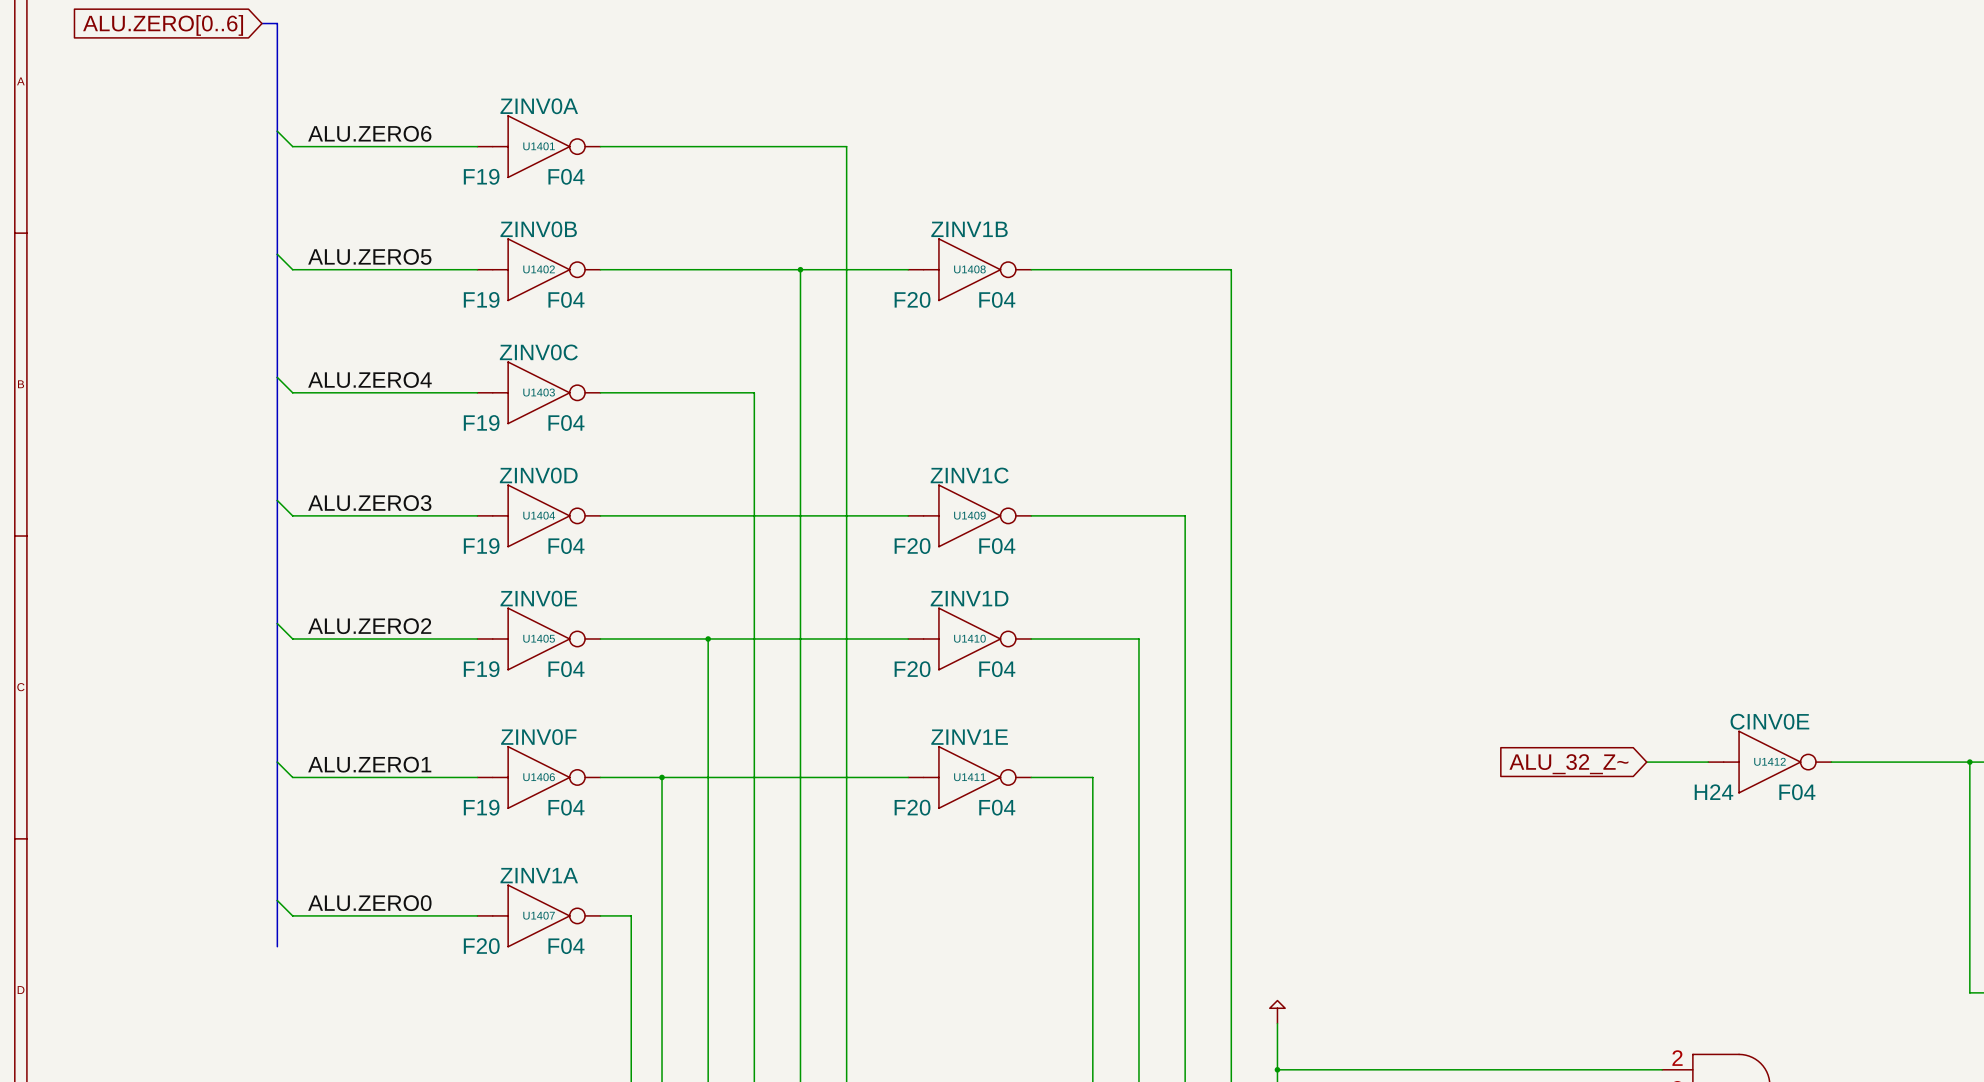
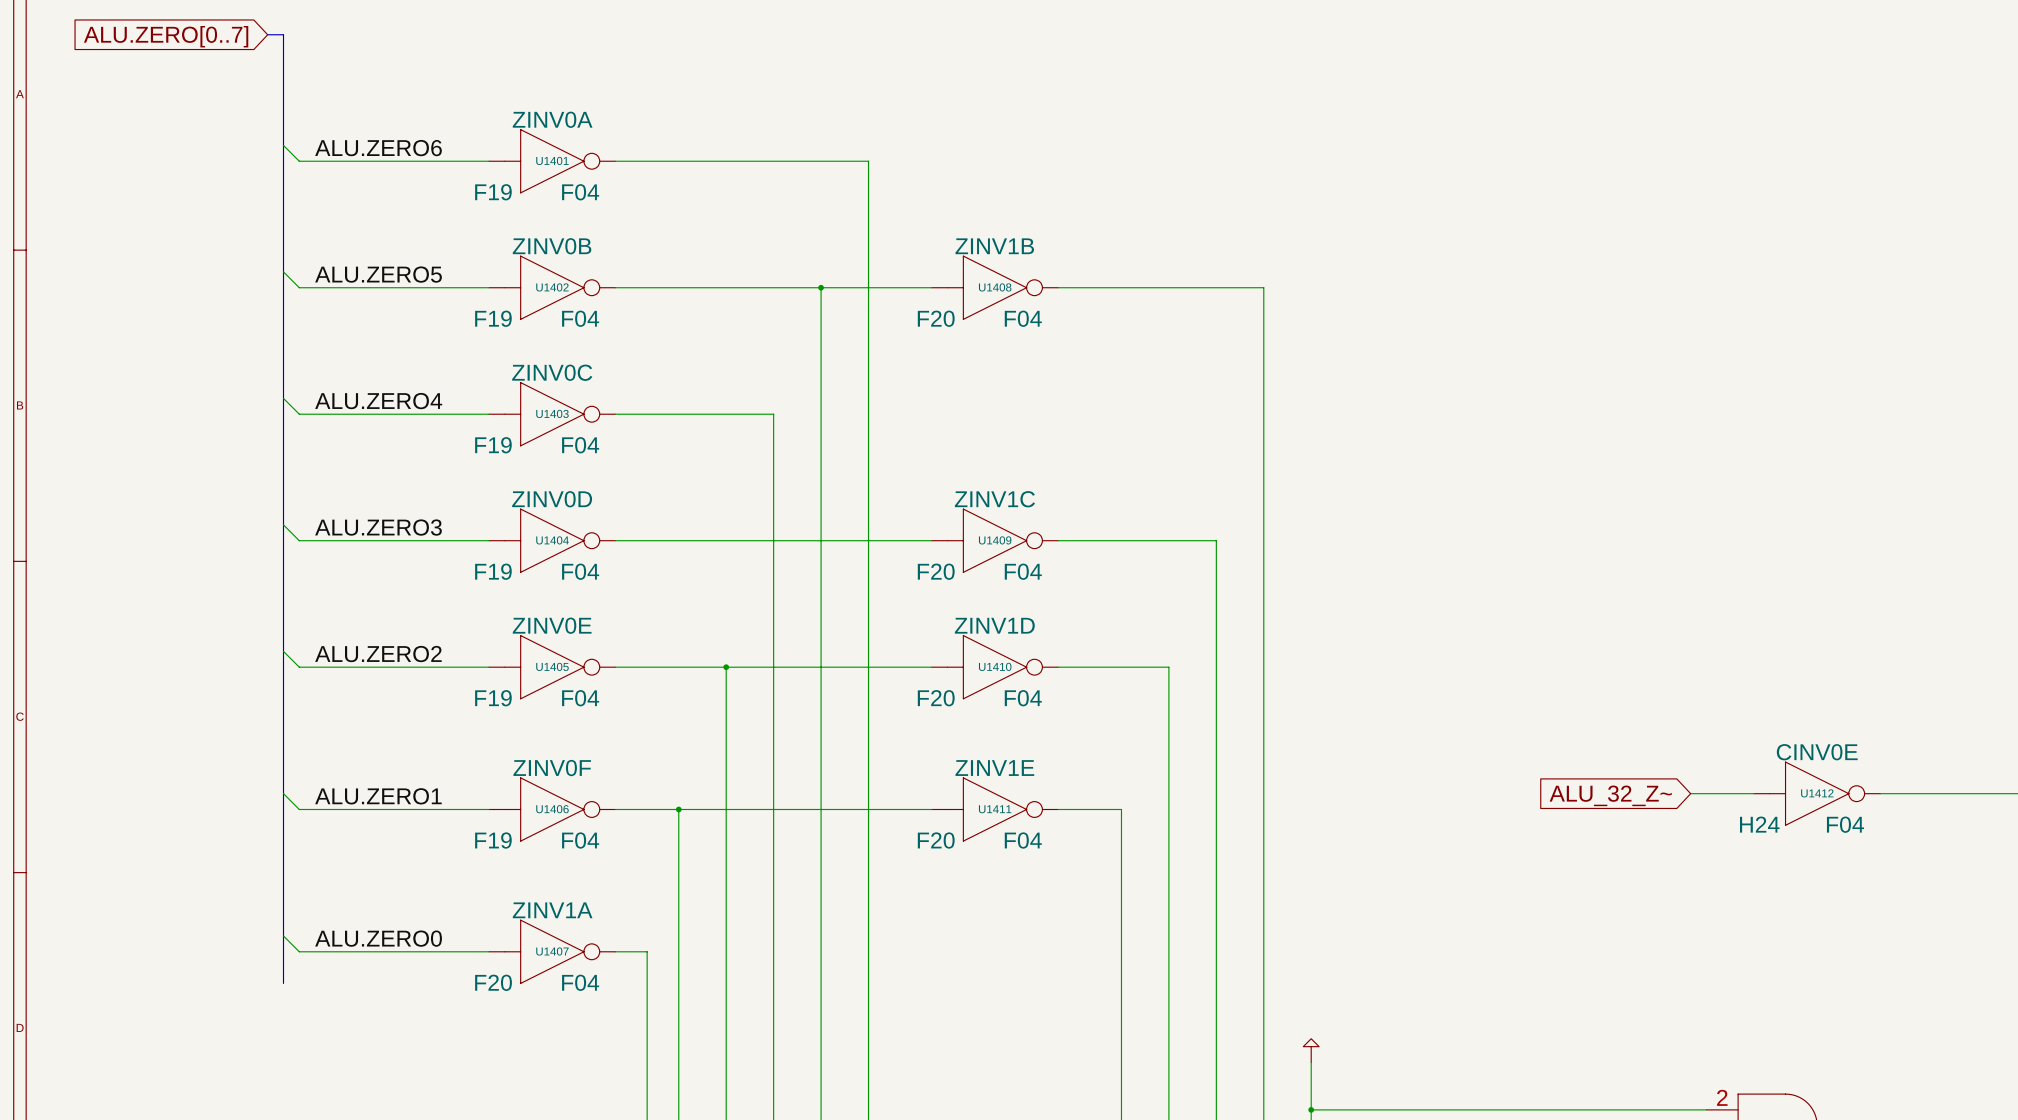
global label: ALU.ZERO[0..6] (163, 25) -> ALU.ZERO[0..7] (166, 36)

